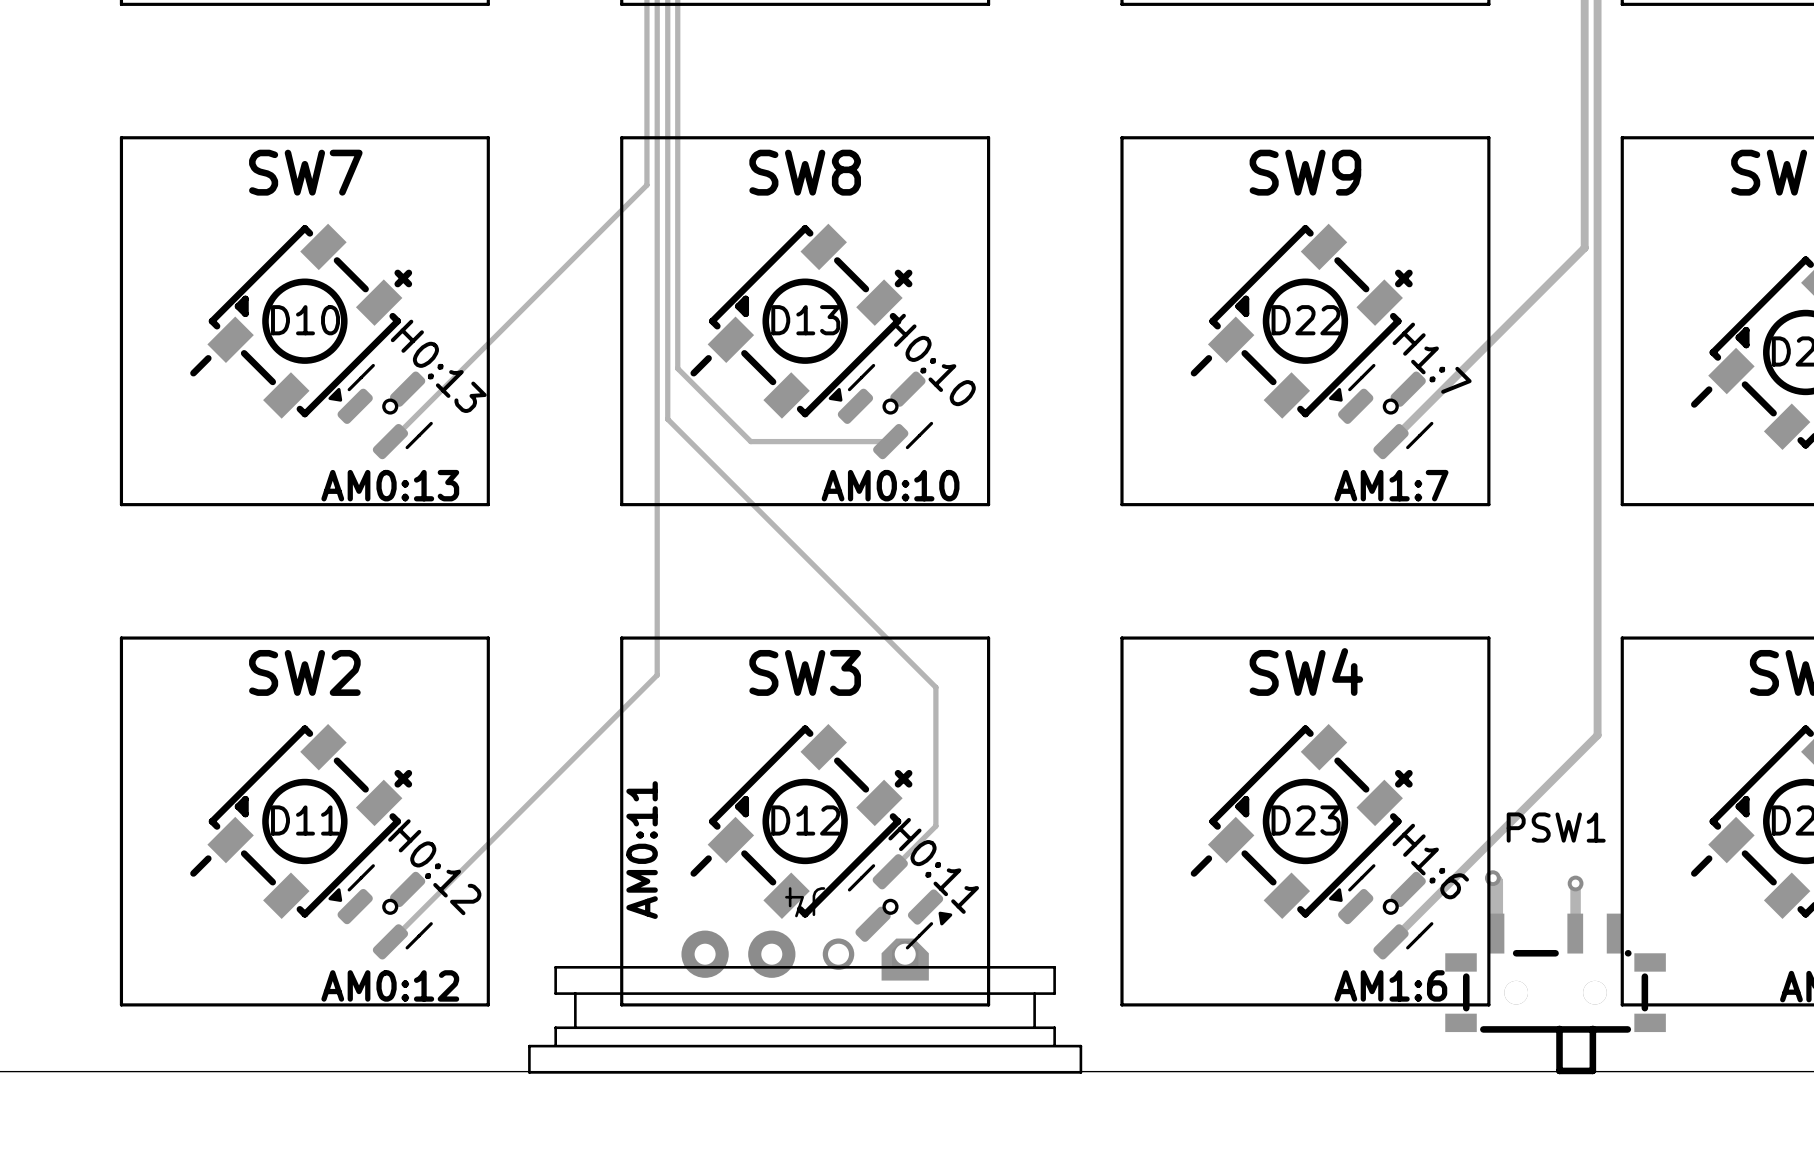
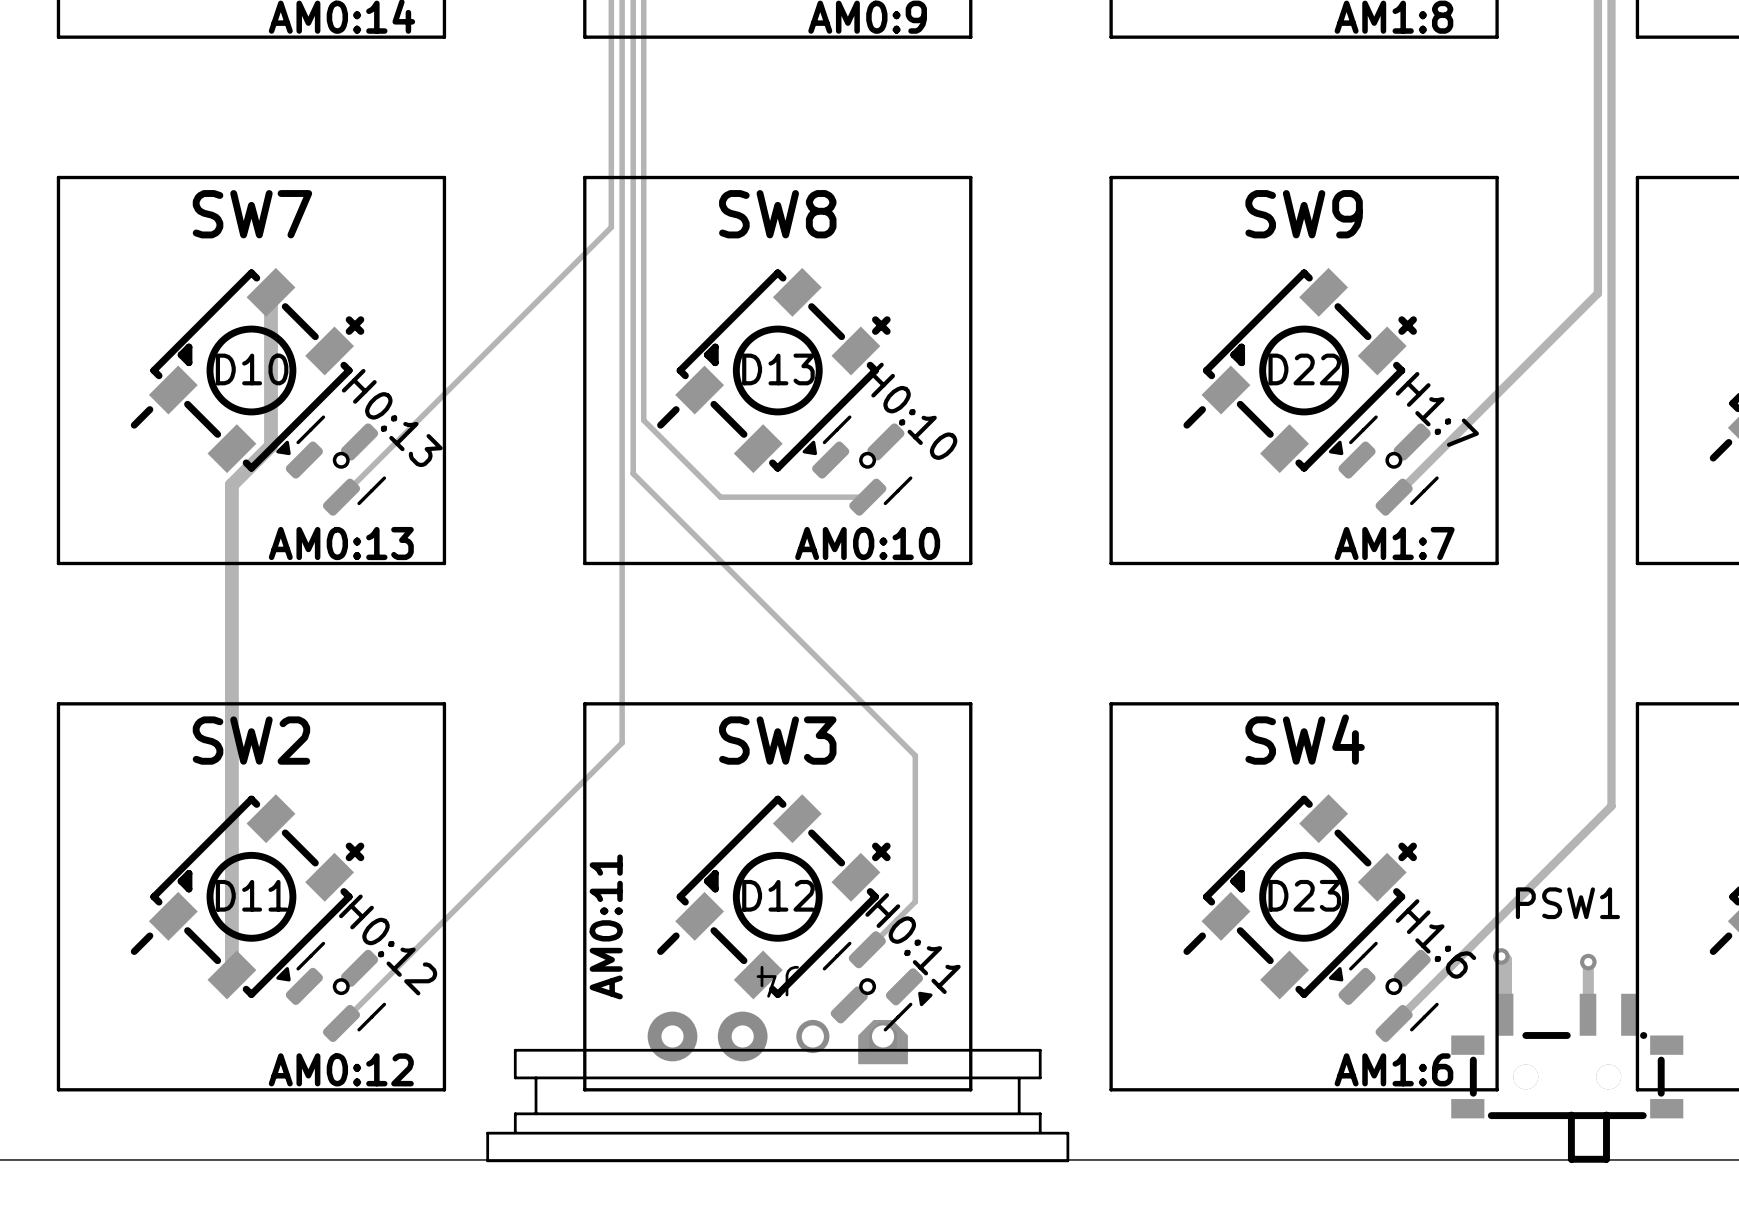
track: none -> (270, 292) (270, 445) (231, 485) (231, 974)

